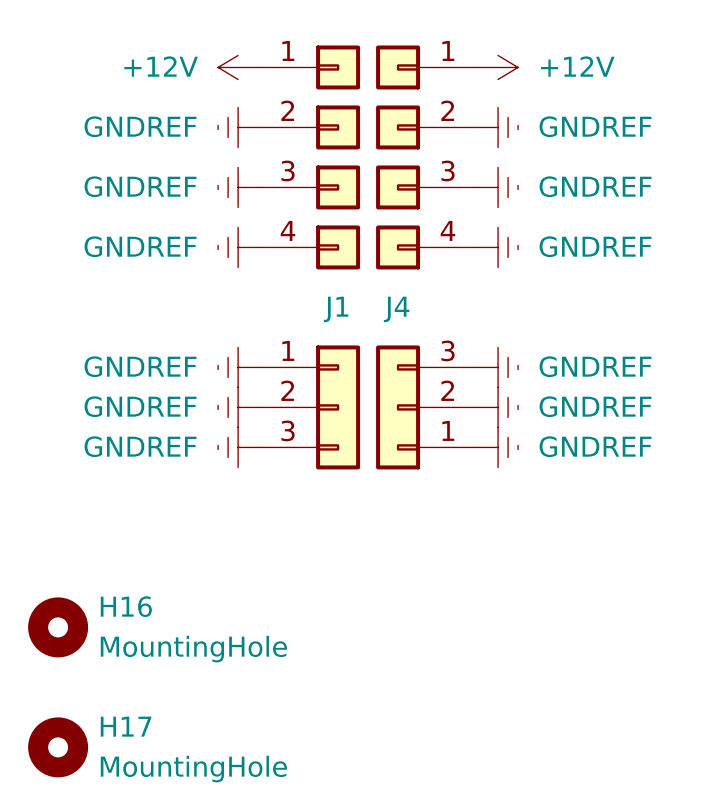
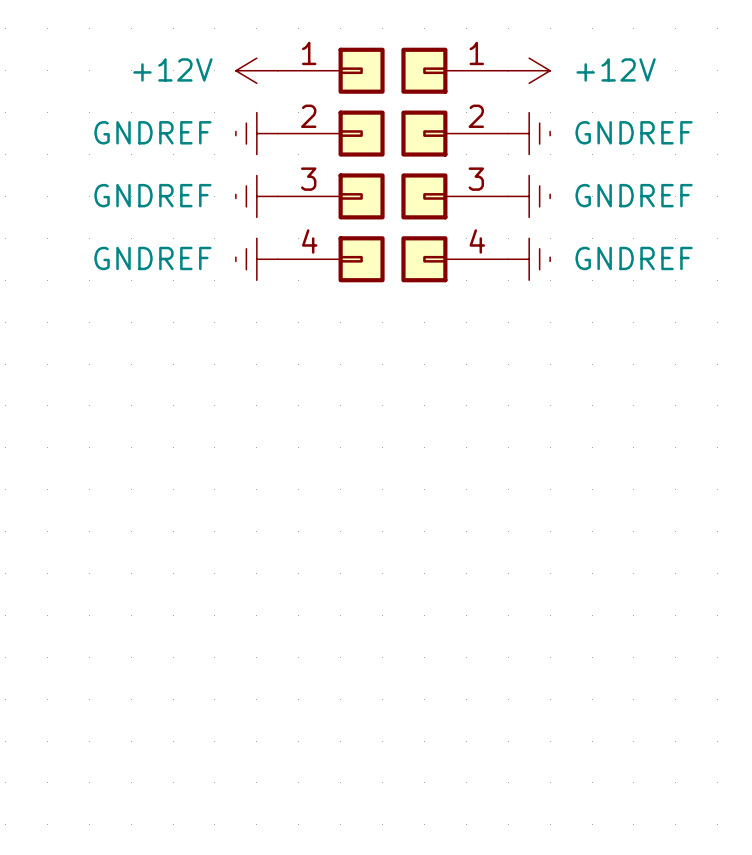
power symbol: GNDREF (238, 367) -> none
power symbol: GNDREF (498, 367) -> none
power symbol: GNDREF (238, 407) -> none
J1: (309, 407) -> none
J4: (427, 407) -> none
power symbol: GNDREF (498, 407) -> none
power symbol: GNDREF (238, 447) -> none
power symbol: GNDREF (498, 447) -> none
H16: MountingHole (58, 627) -> none
H17: MountingHole (58, 747) -> none

